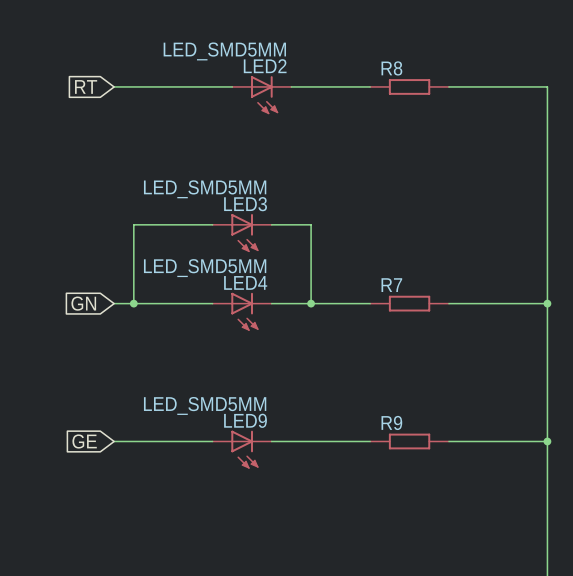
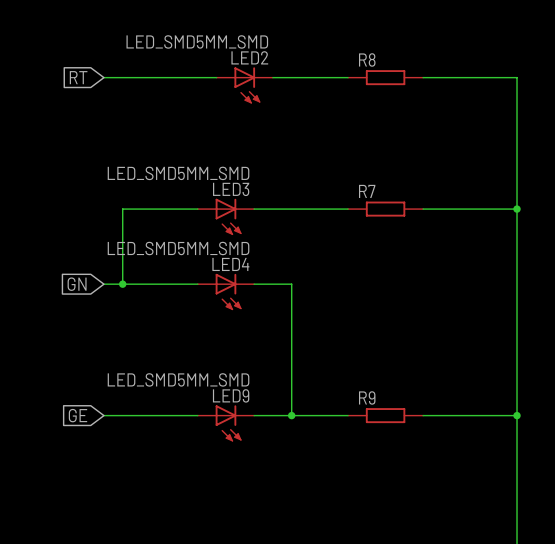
LED2 value: LED_SMD5MM (224, 51) -> LED_SMD5MM_SMD (197, 41)
LED3 value: LED_SMD5MM (205, 189) -> LED_SMD5MM_SMD (178, 173)
wire: (311, 224) (311, 303) (370, 303) -> (291, 209) (348, 209)
junction: none -> (517, 209)
LED4 value: LED_SMD5MM (205, 268) -> LED_SMD5MM_SMD (178, 248)
wire: none -> (291, 284) (291, 415)
junction: (311, 303) -> none
R7 position: (409, 303) -> (385, 209)
wire: (448, 303) (547, 303) -> (423, 209) (517, 209)
junction: (547, 303) -> none
LED9 value: LED_SMD5MM (205, 405) -> LED_SMD5MM_SMD (178, 379)
junction: none -> (291, 415)

